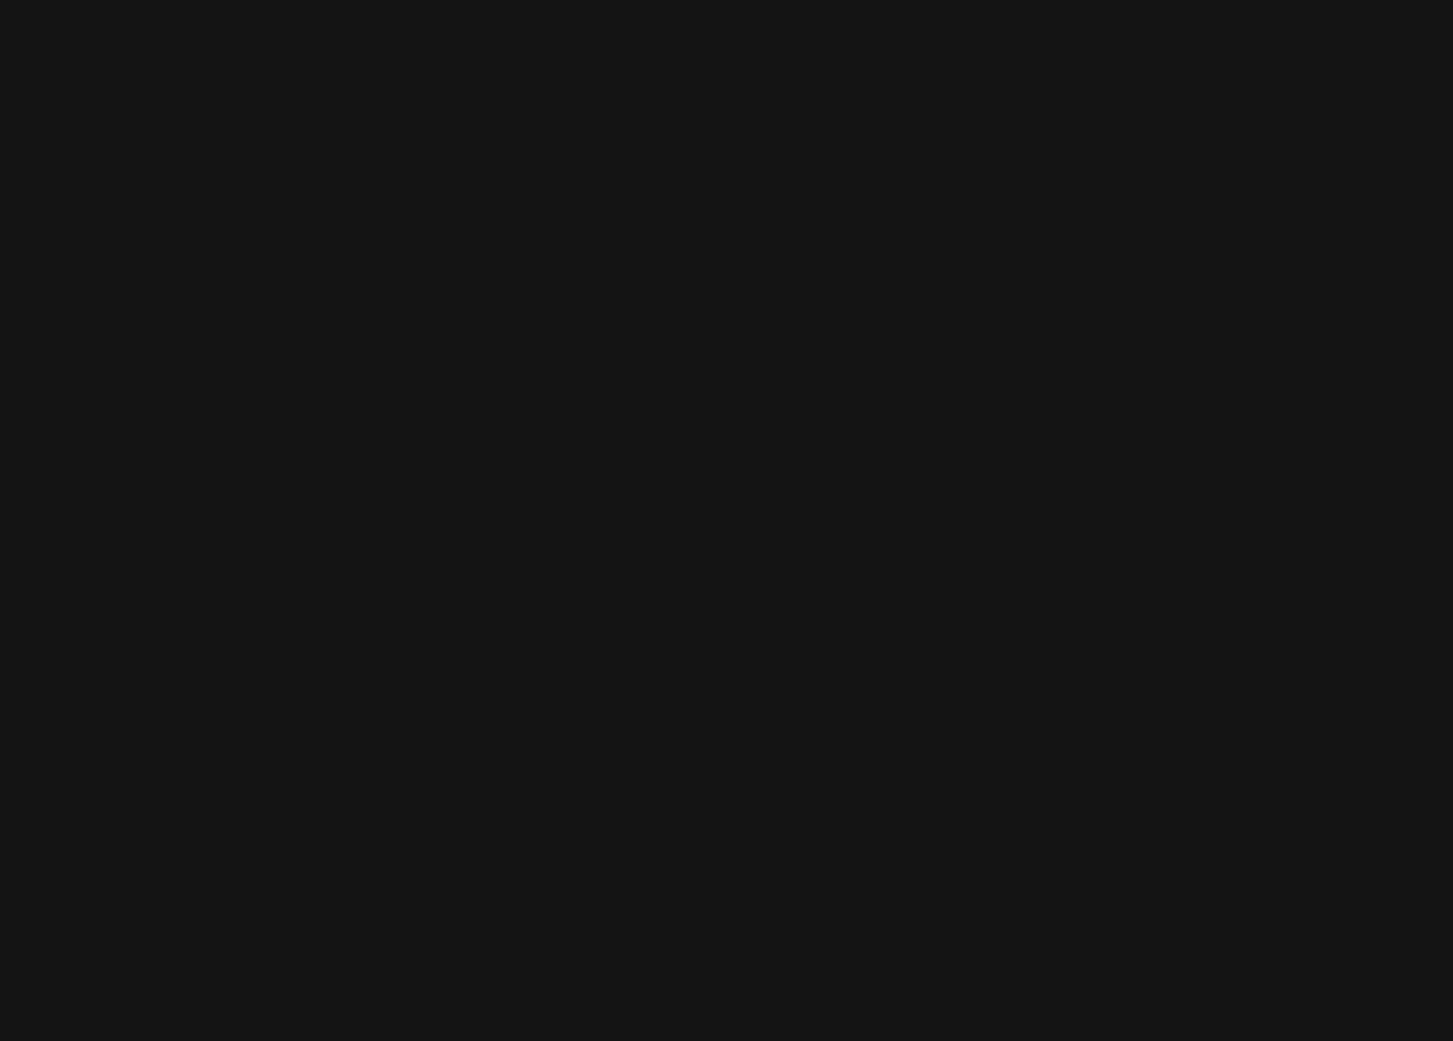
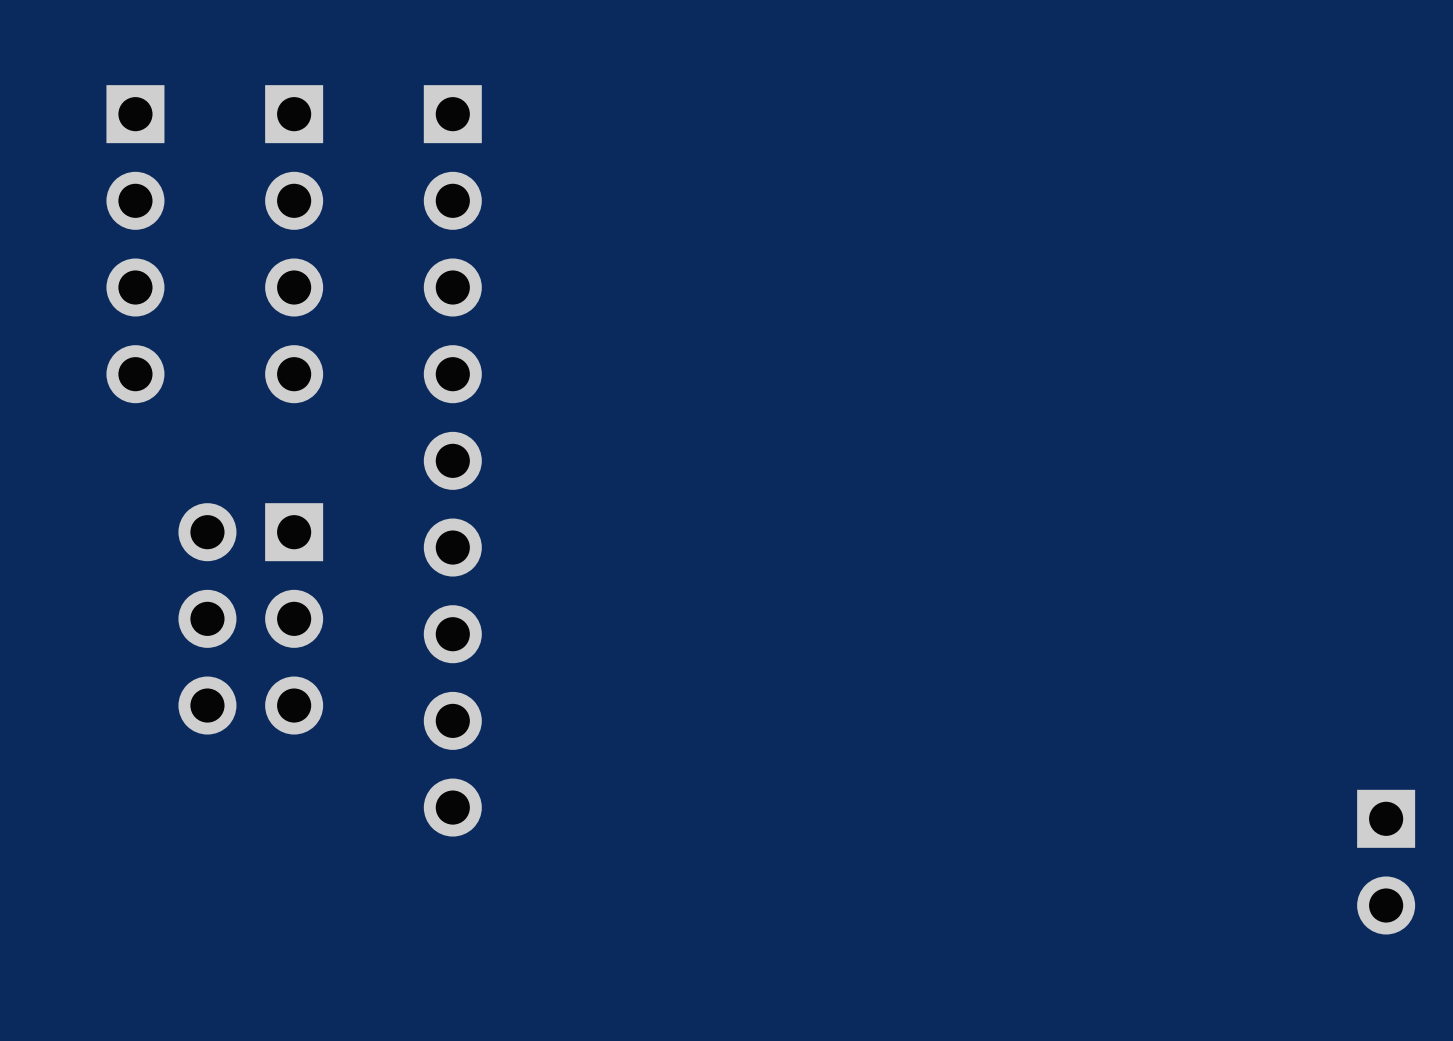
part: none -> (135, 244)
part: none -> (294, 244)
part: none -> (452, 460)
part: none -> (250, 618)
part: none -> (1386, 862)

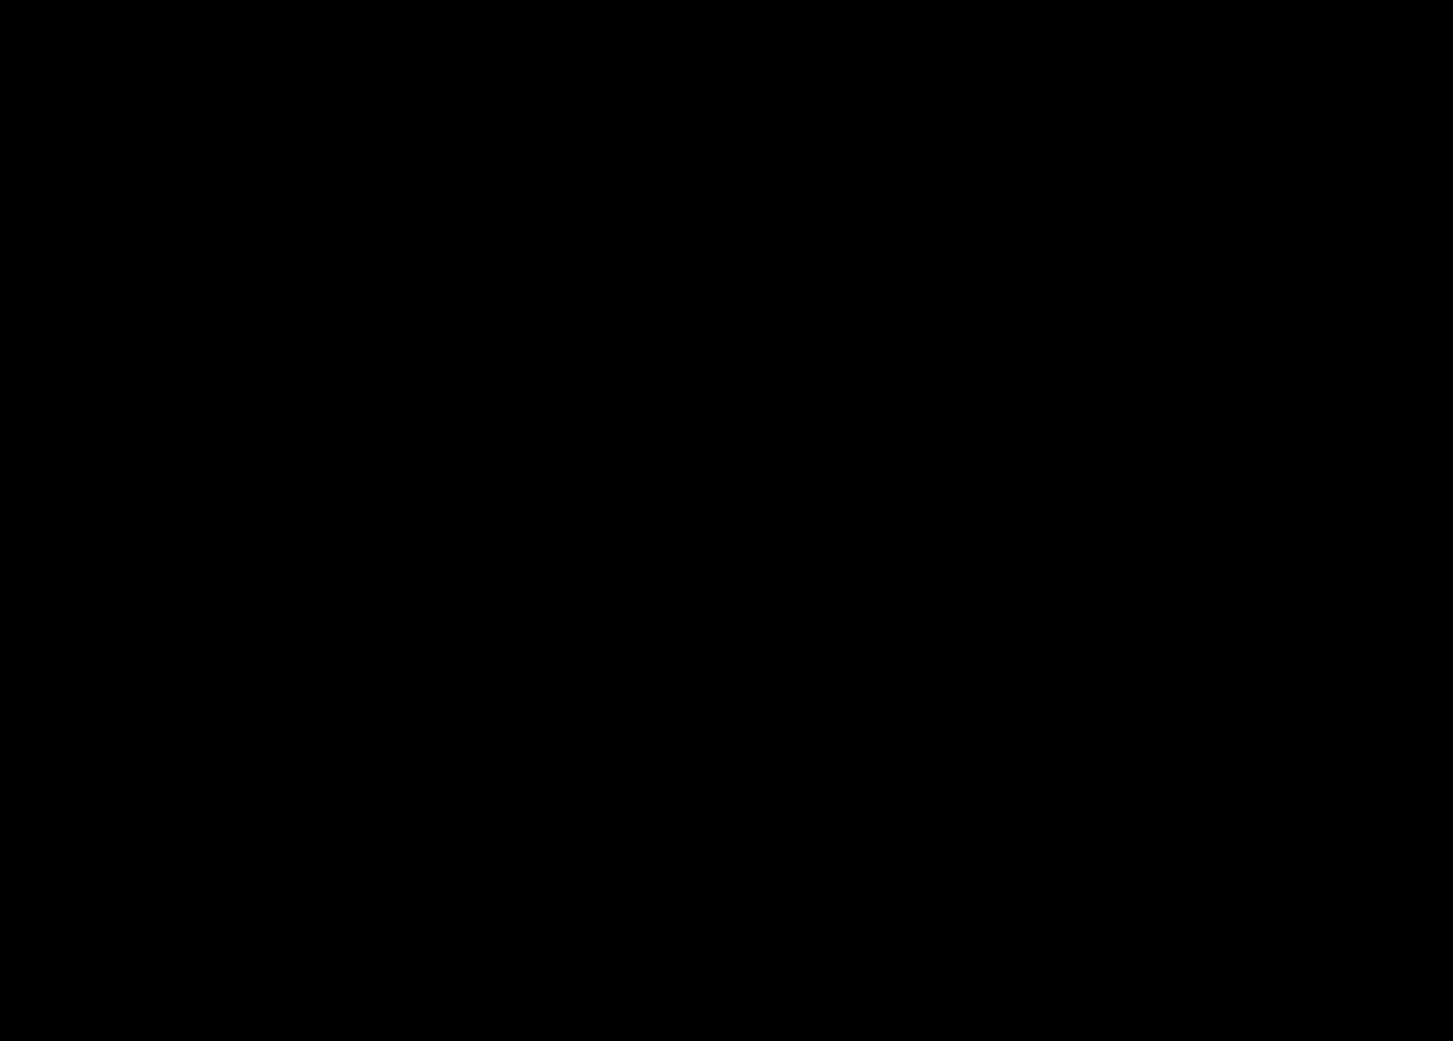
part: (135, 244) -> none
part: (294, 244) -> none
part: (452, 460) -> none
part: (250, 618) -> none
part: (1386, 862) -> none

